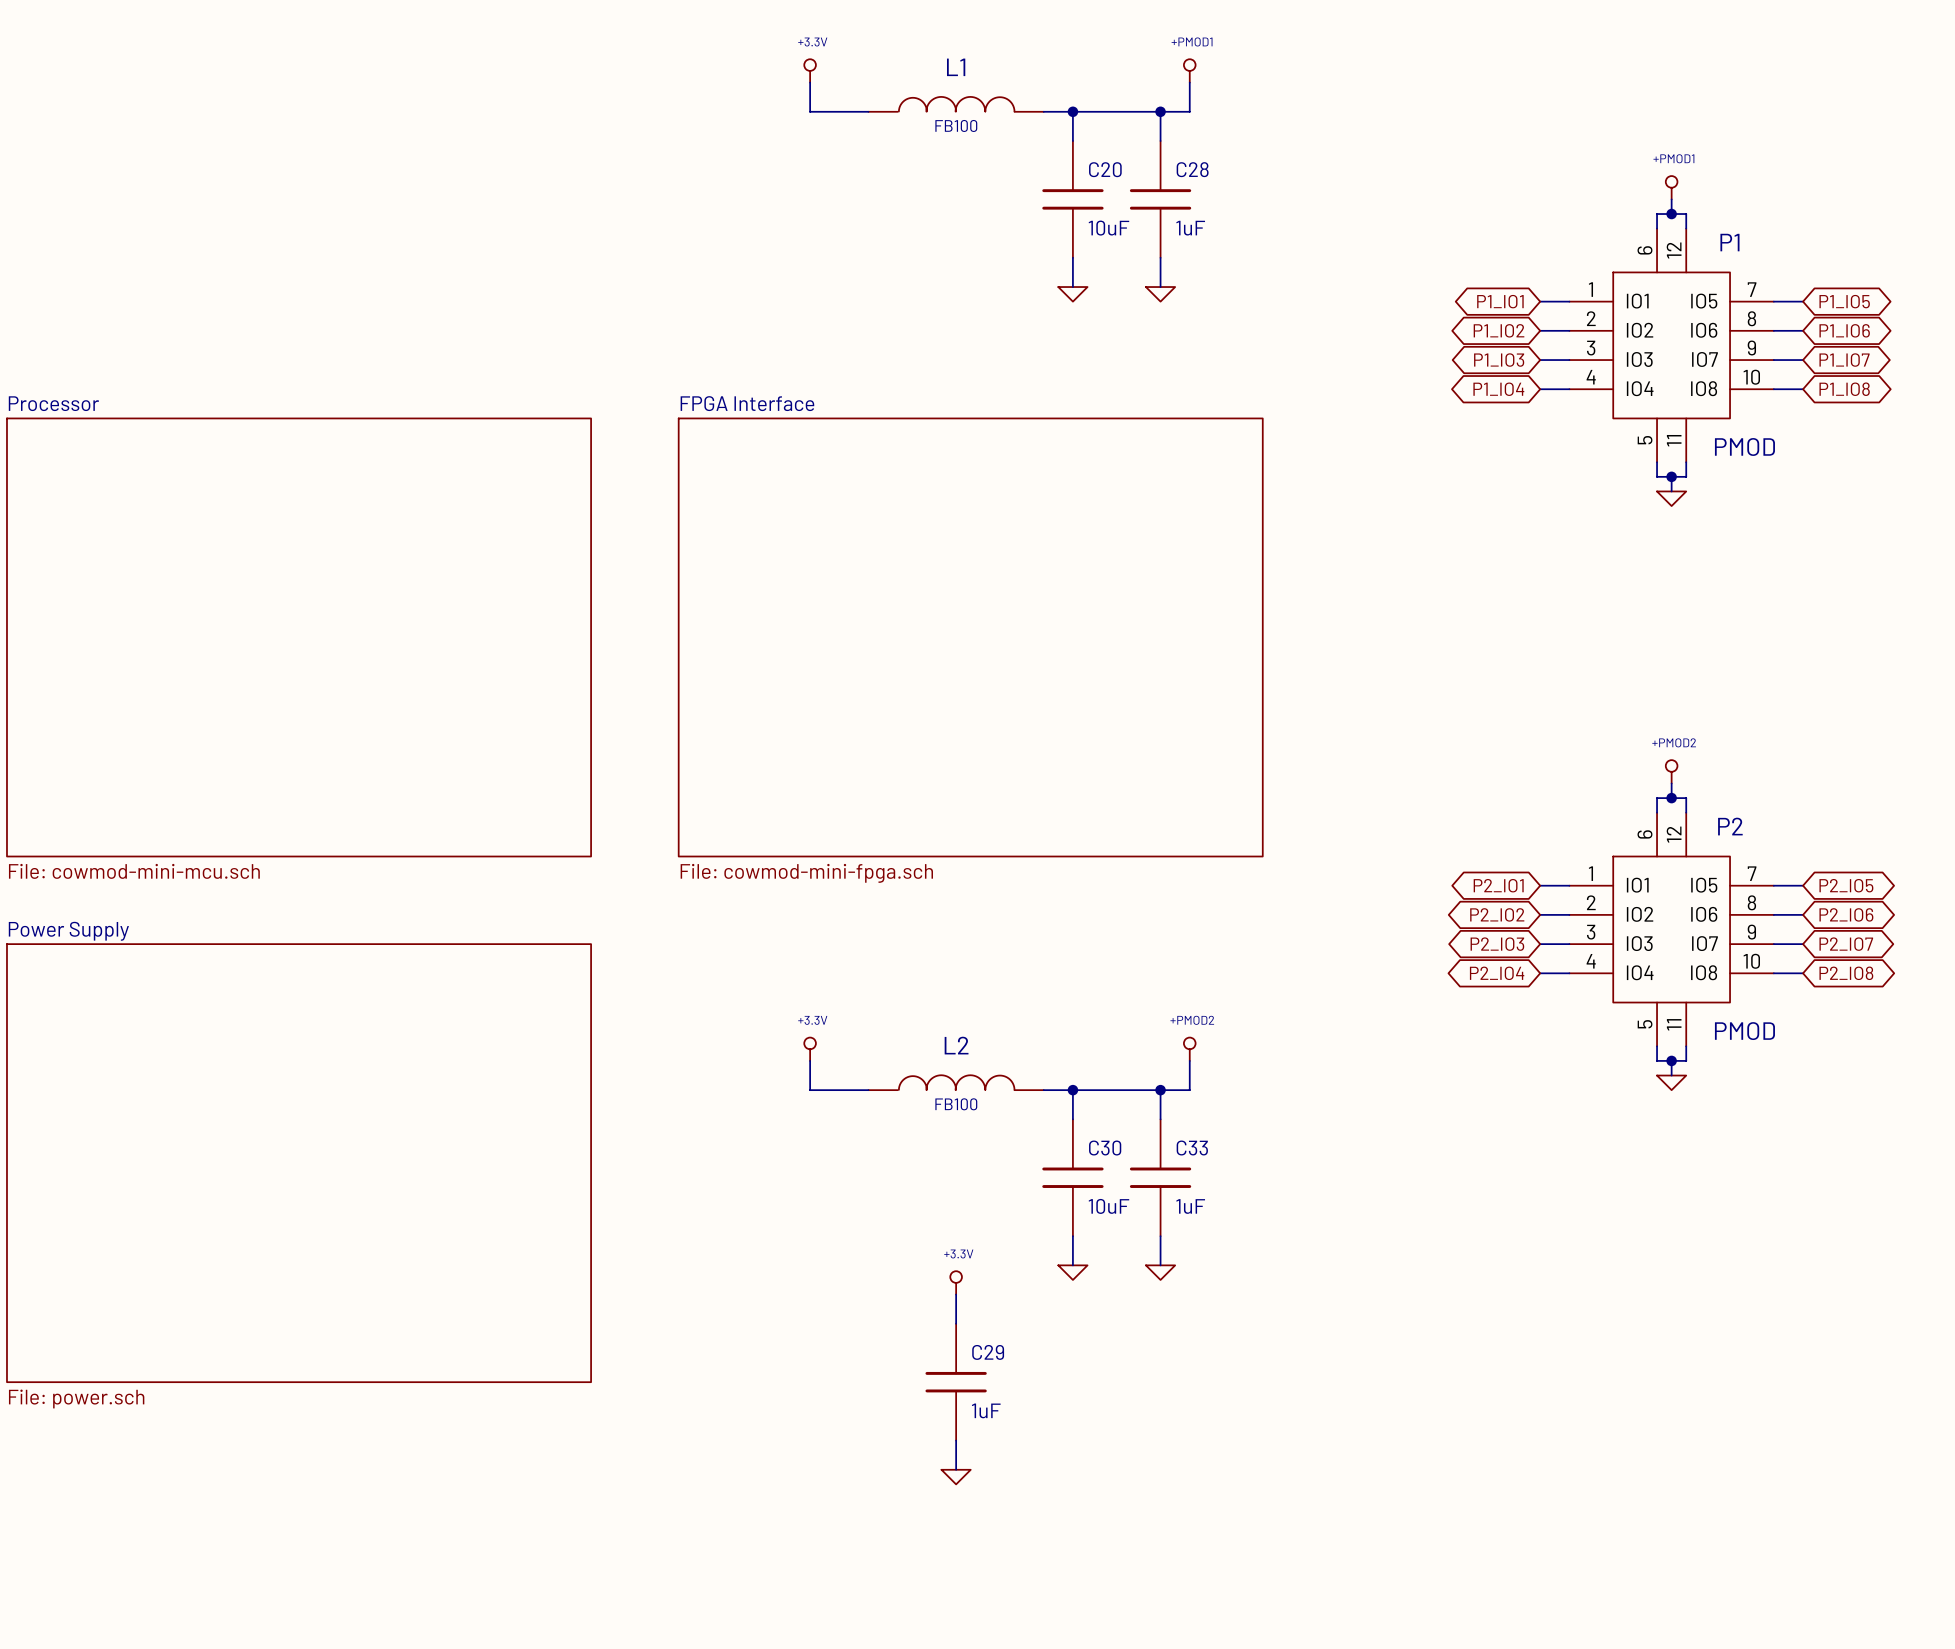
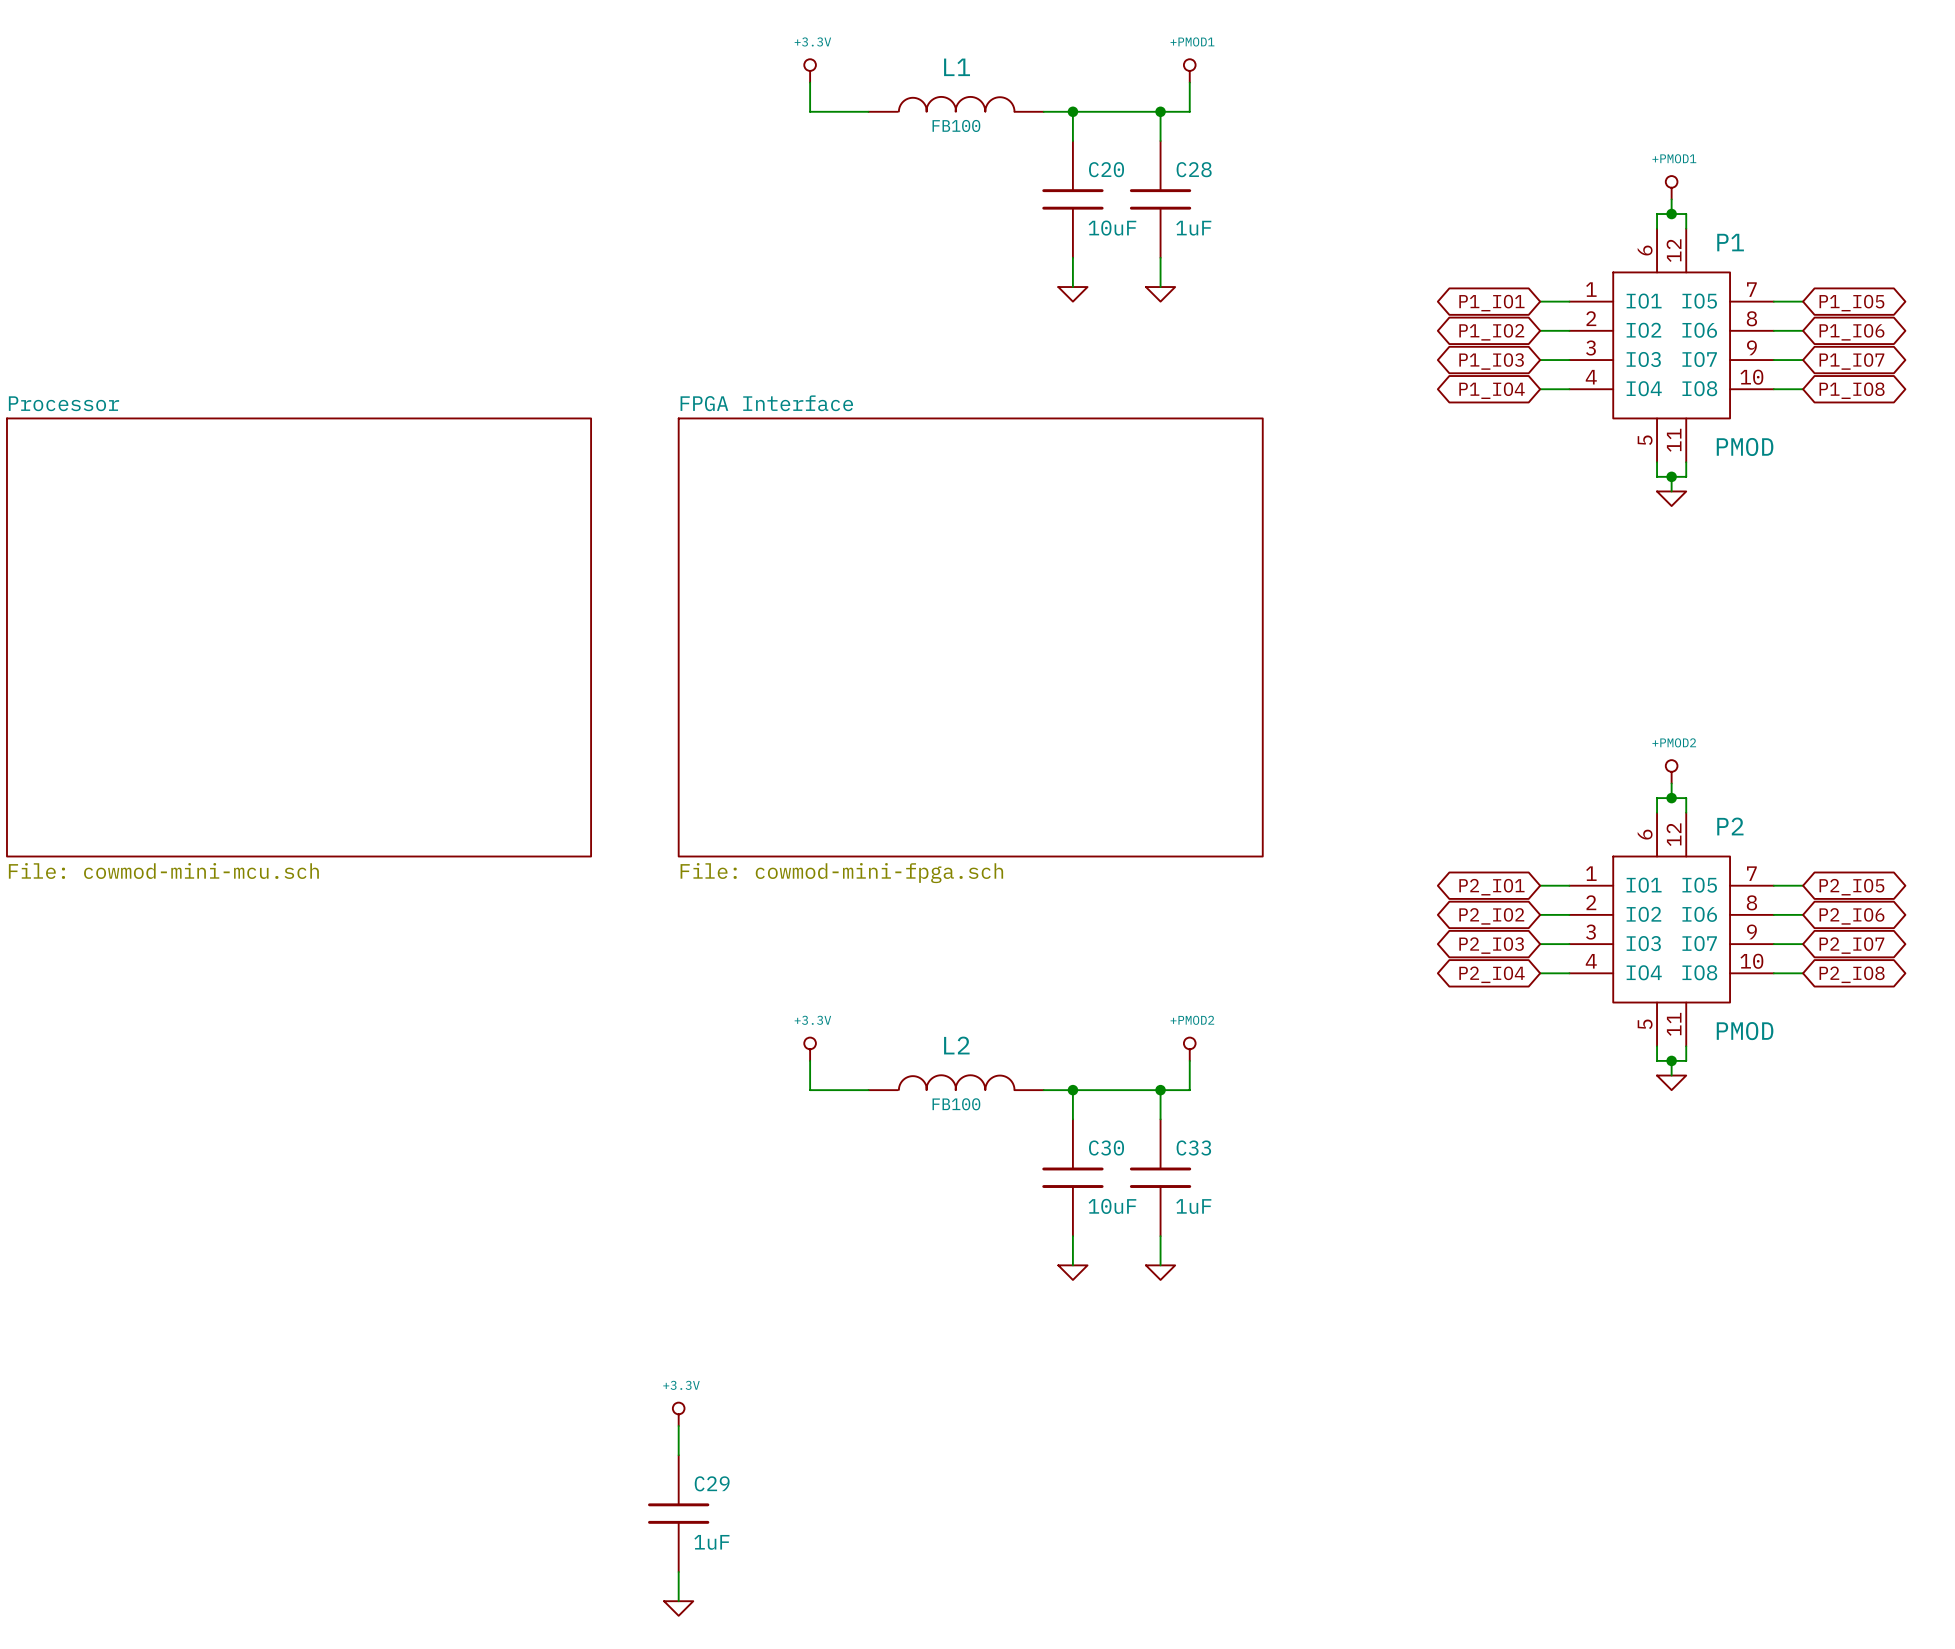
sheet Power Supply: File: power.sch (299, 1163) -> none
power symbol: +3.3V (956, 1282) -> none
wire: (956, 1294) (956, 1323) -> none
C29 position: (956, 1382) -> (678, 1513)
power symbol: none -> +3.3V (678, 1414)
wire: (956, 1440) (956, 1469) -> (678, 1425) (678, 1455)
power symbol: (956, 1477) -> none
wire: none -> (678, 1572) (678, 1601)
power symbol: none -> (678, 1608)

